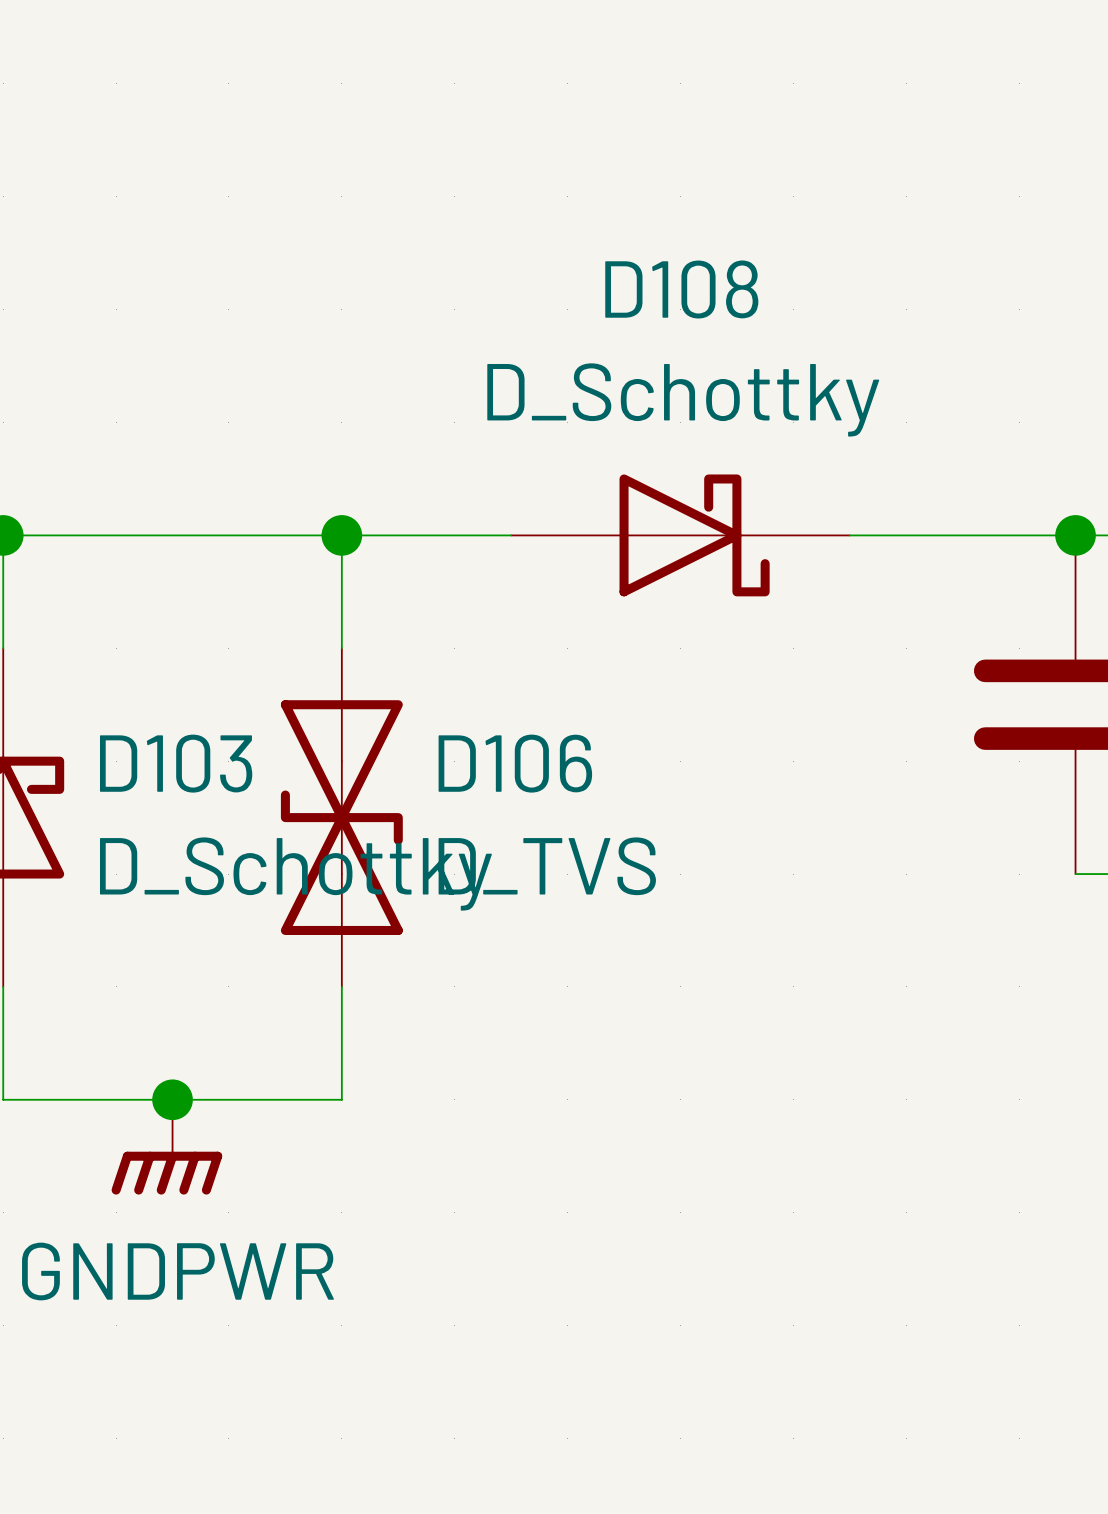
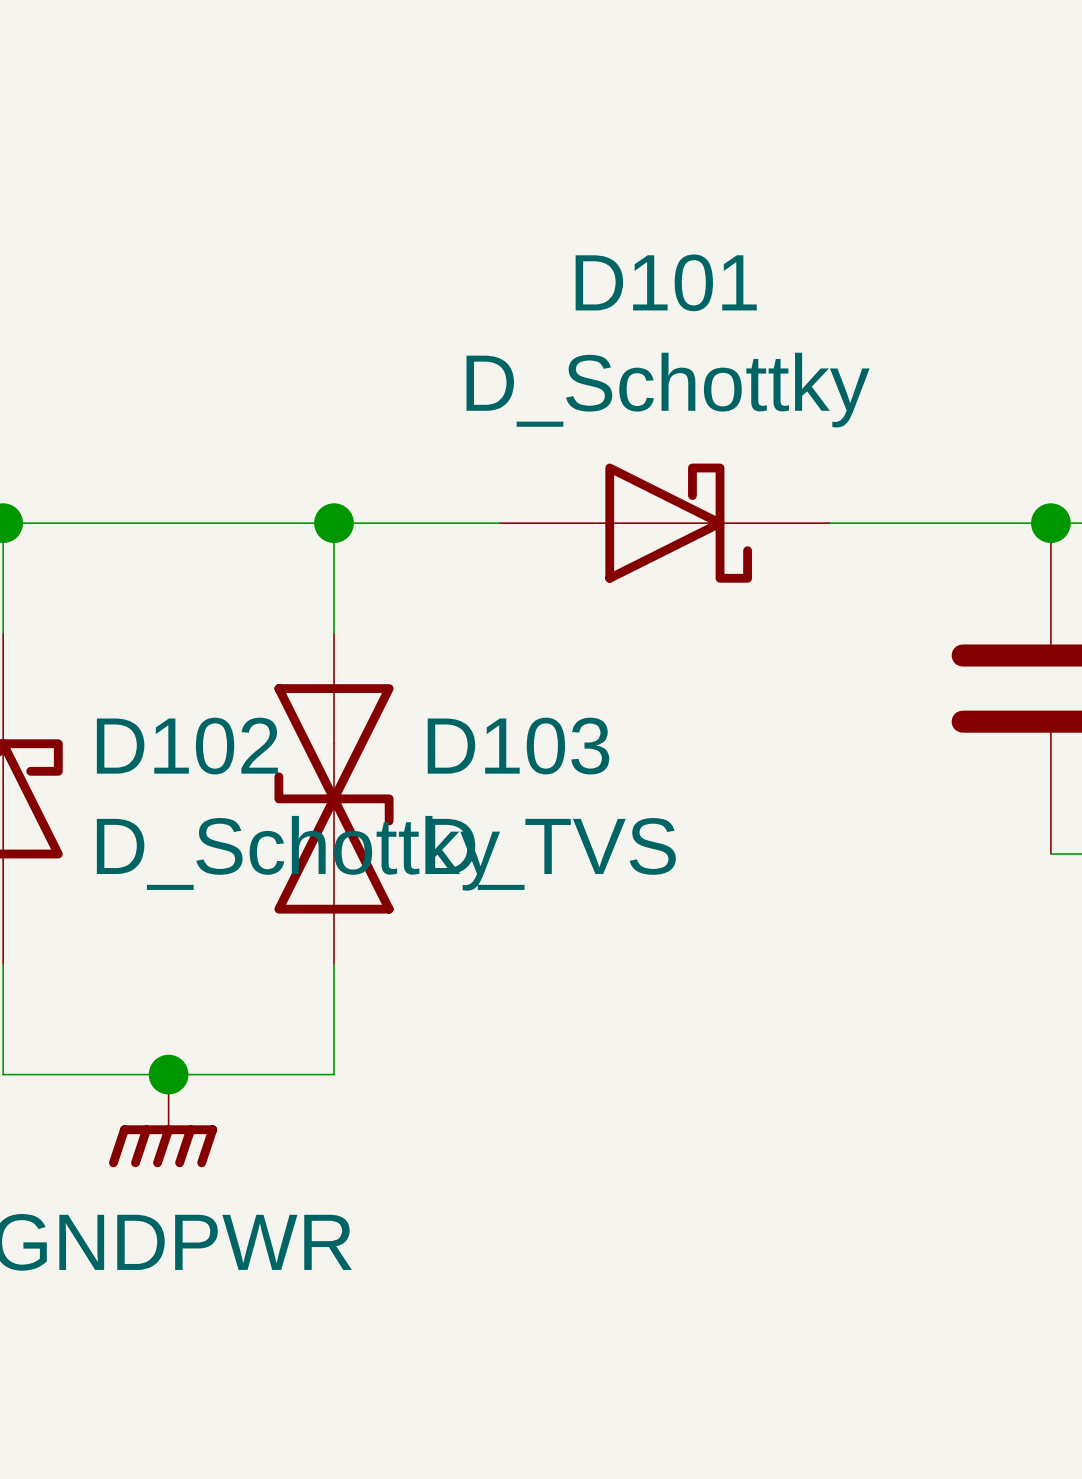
D108 name: D108 (681, 289) -> D101 (666, 282)
D103 name: D103 (176, 763) -> D102 (187, 746)
D106 name: D106 (515, 763) -> D103 (518, 746)

